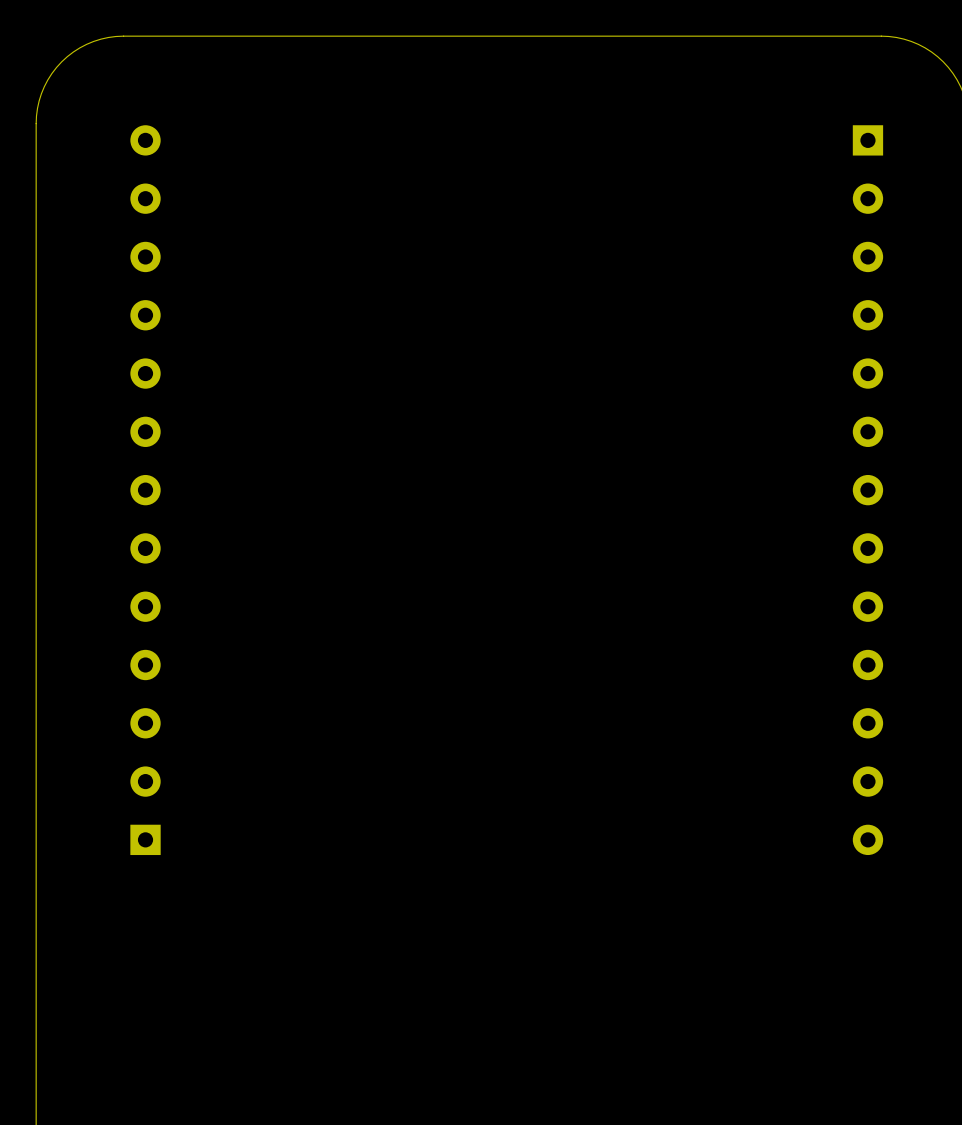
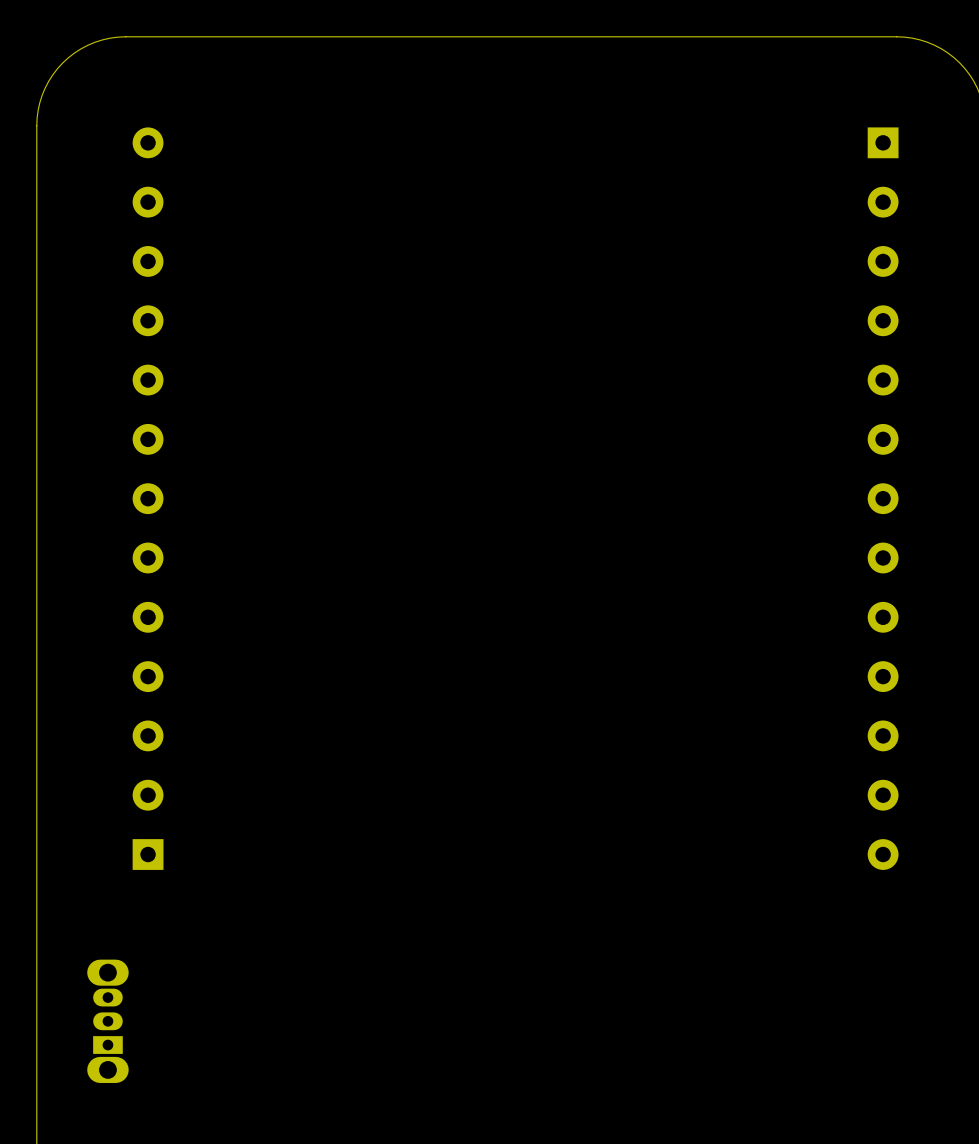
part: none -> (107, 1021)

